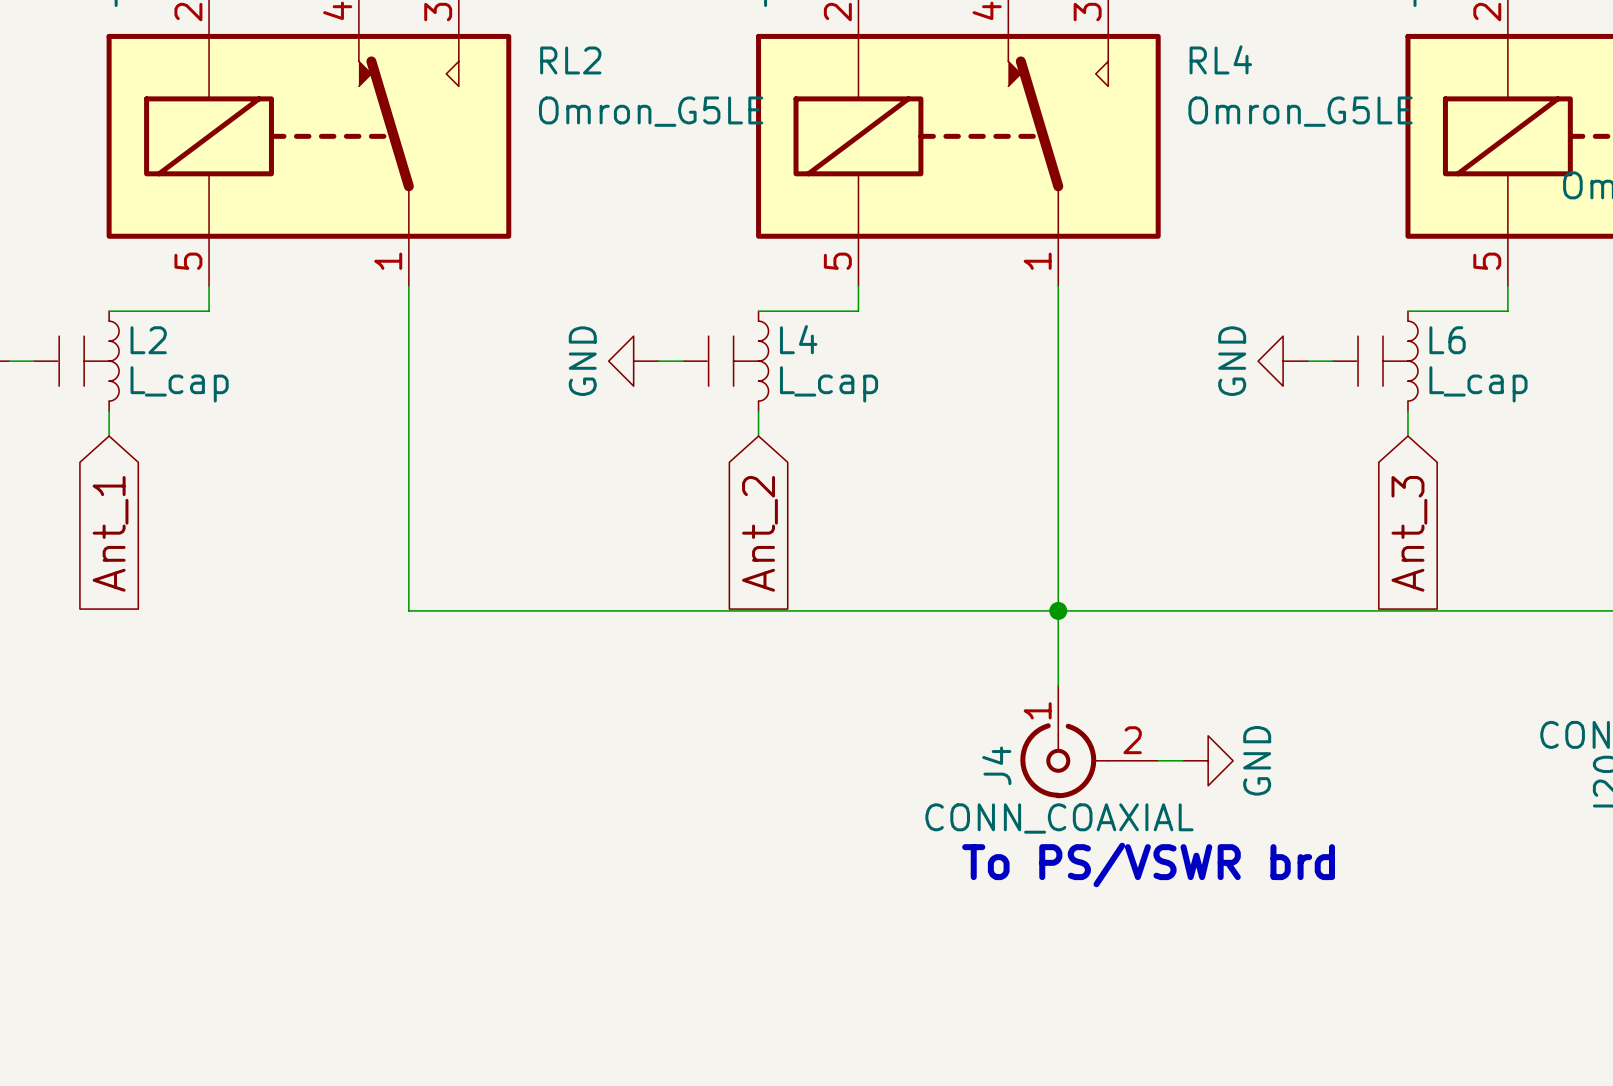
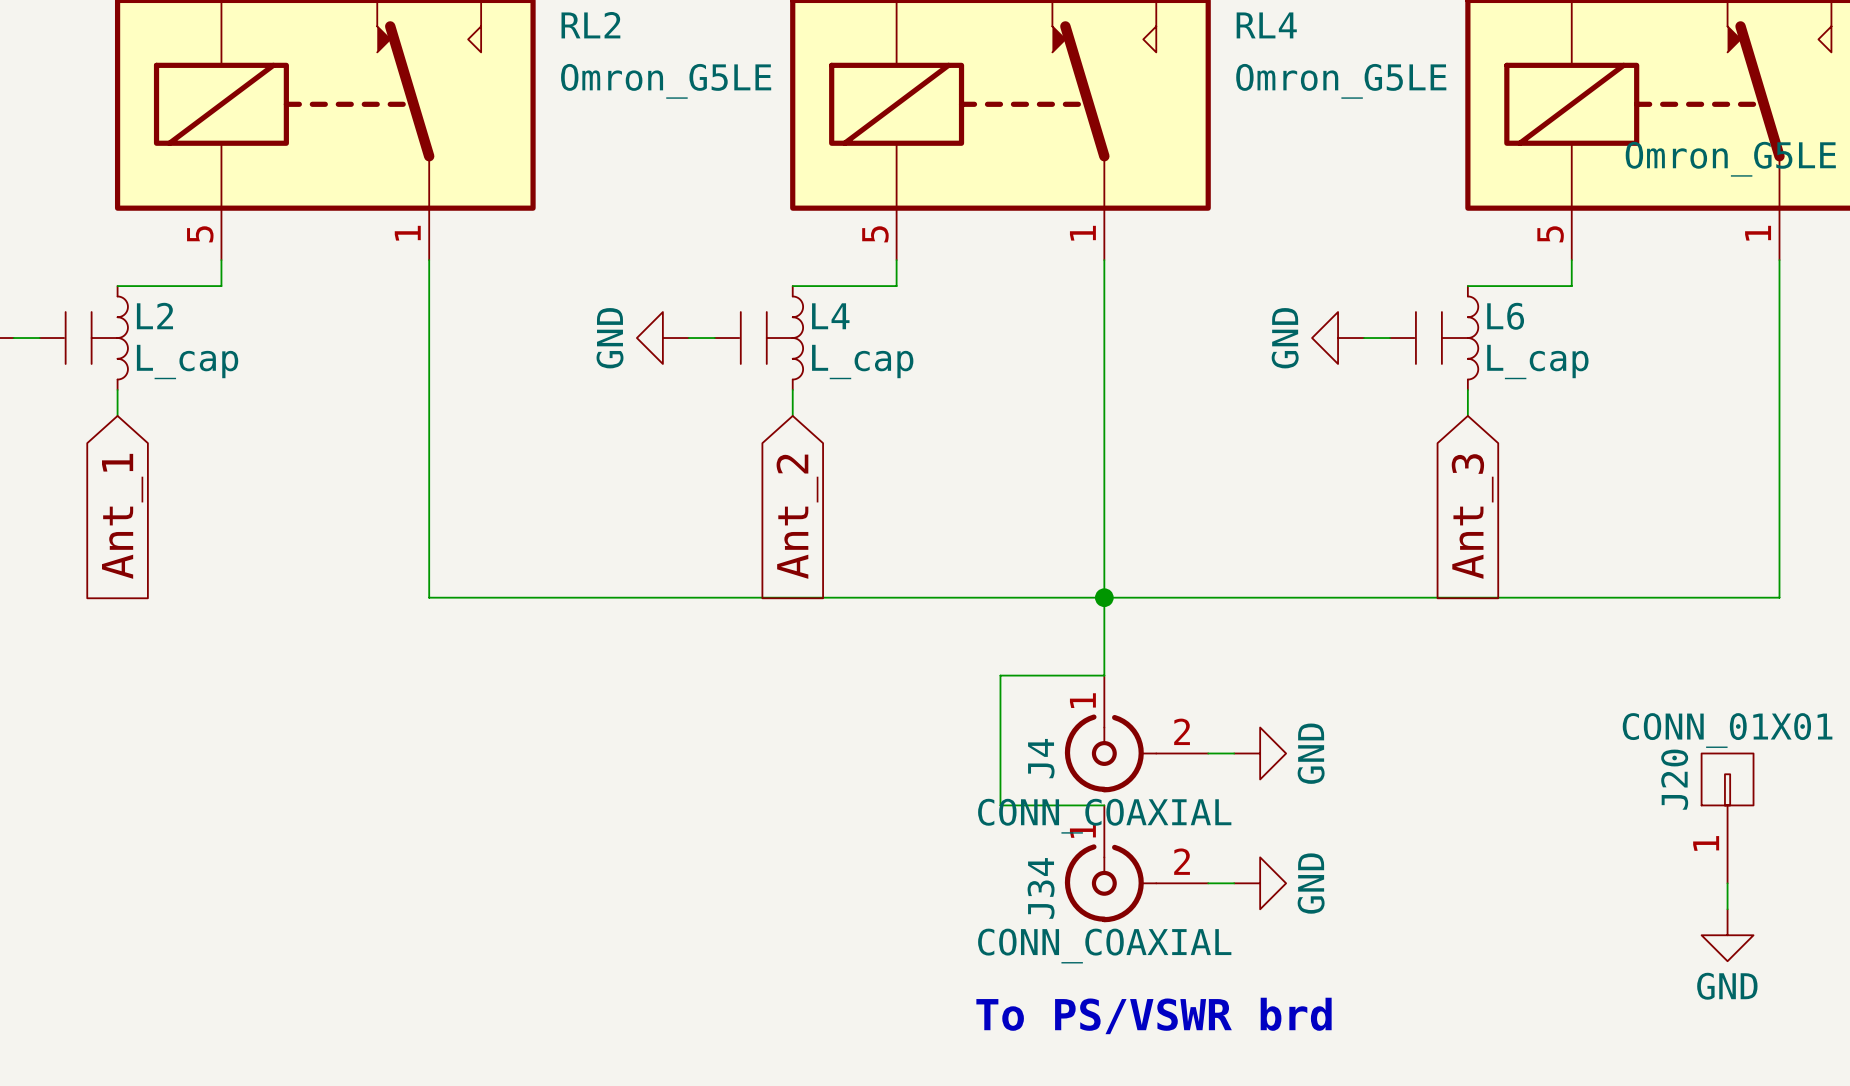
wire: none -> (1104, 675) (1000, 675) (1000, 805) (1104, 805)
text position: To PS/VSWR brd (1148, 864) -> To PS/VSWR brd (1154, 1015)
J34: none -> CONN_COAXIAL (1136, 863)
wire: none -> (1208, 883) (1234, 883)
power symbol: none -> GND (1260, 883)

